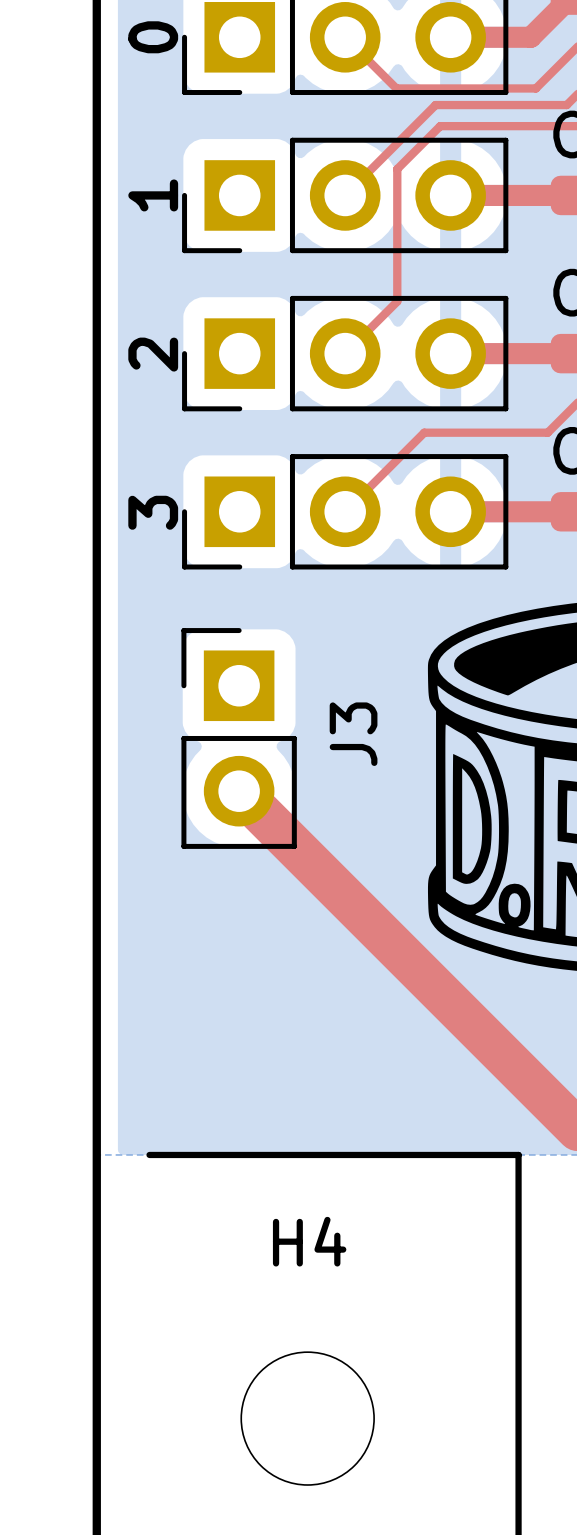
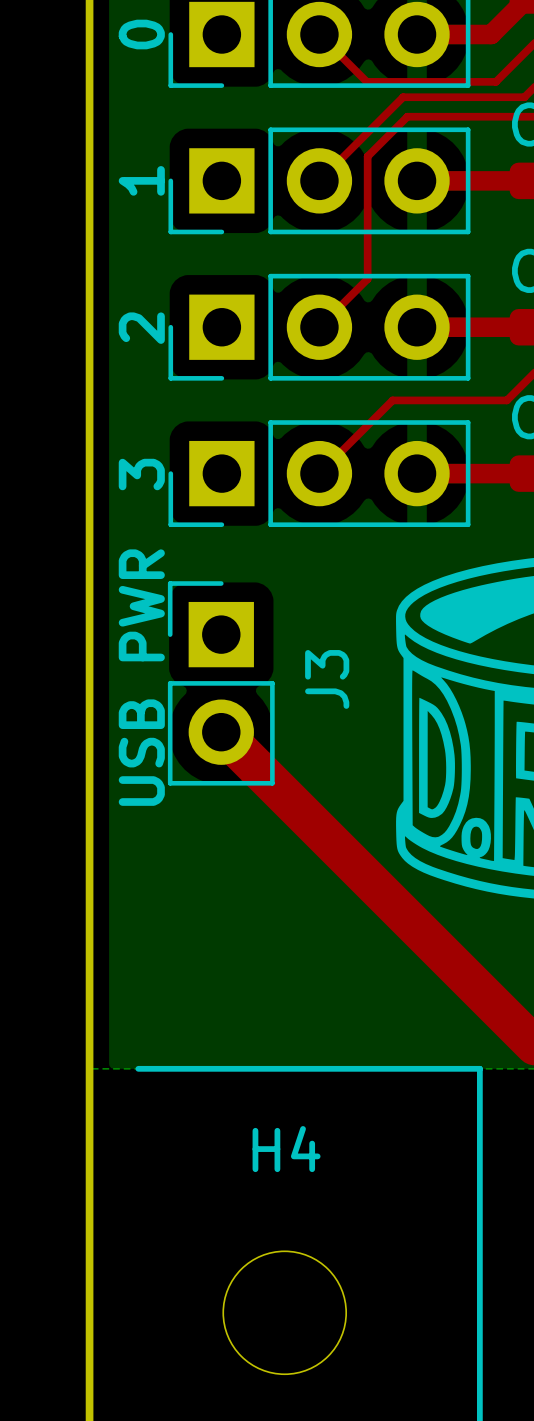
text: none -> USB PWR (141, 677)

